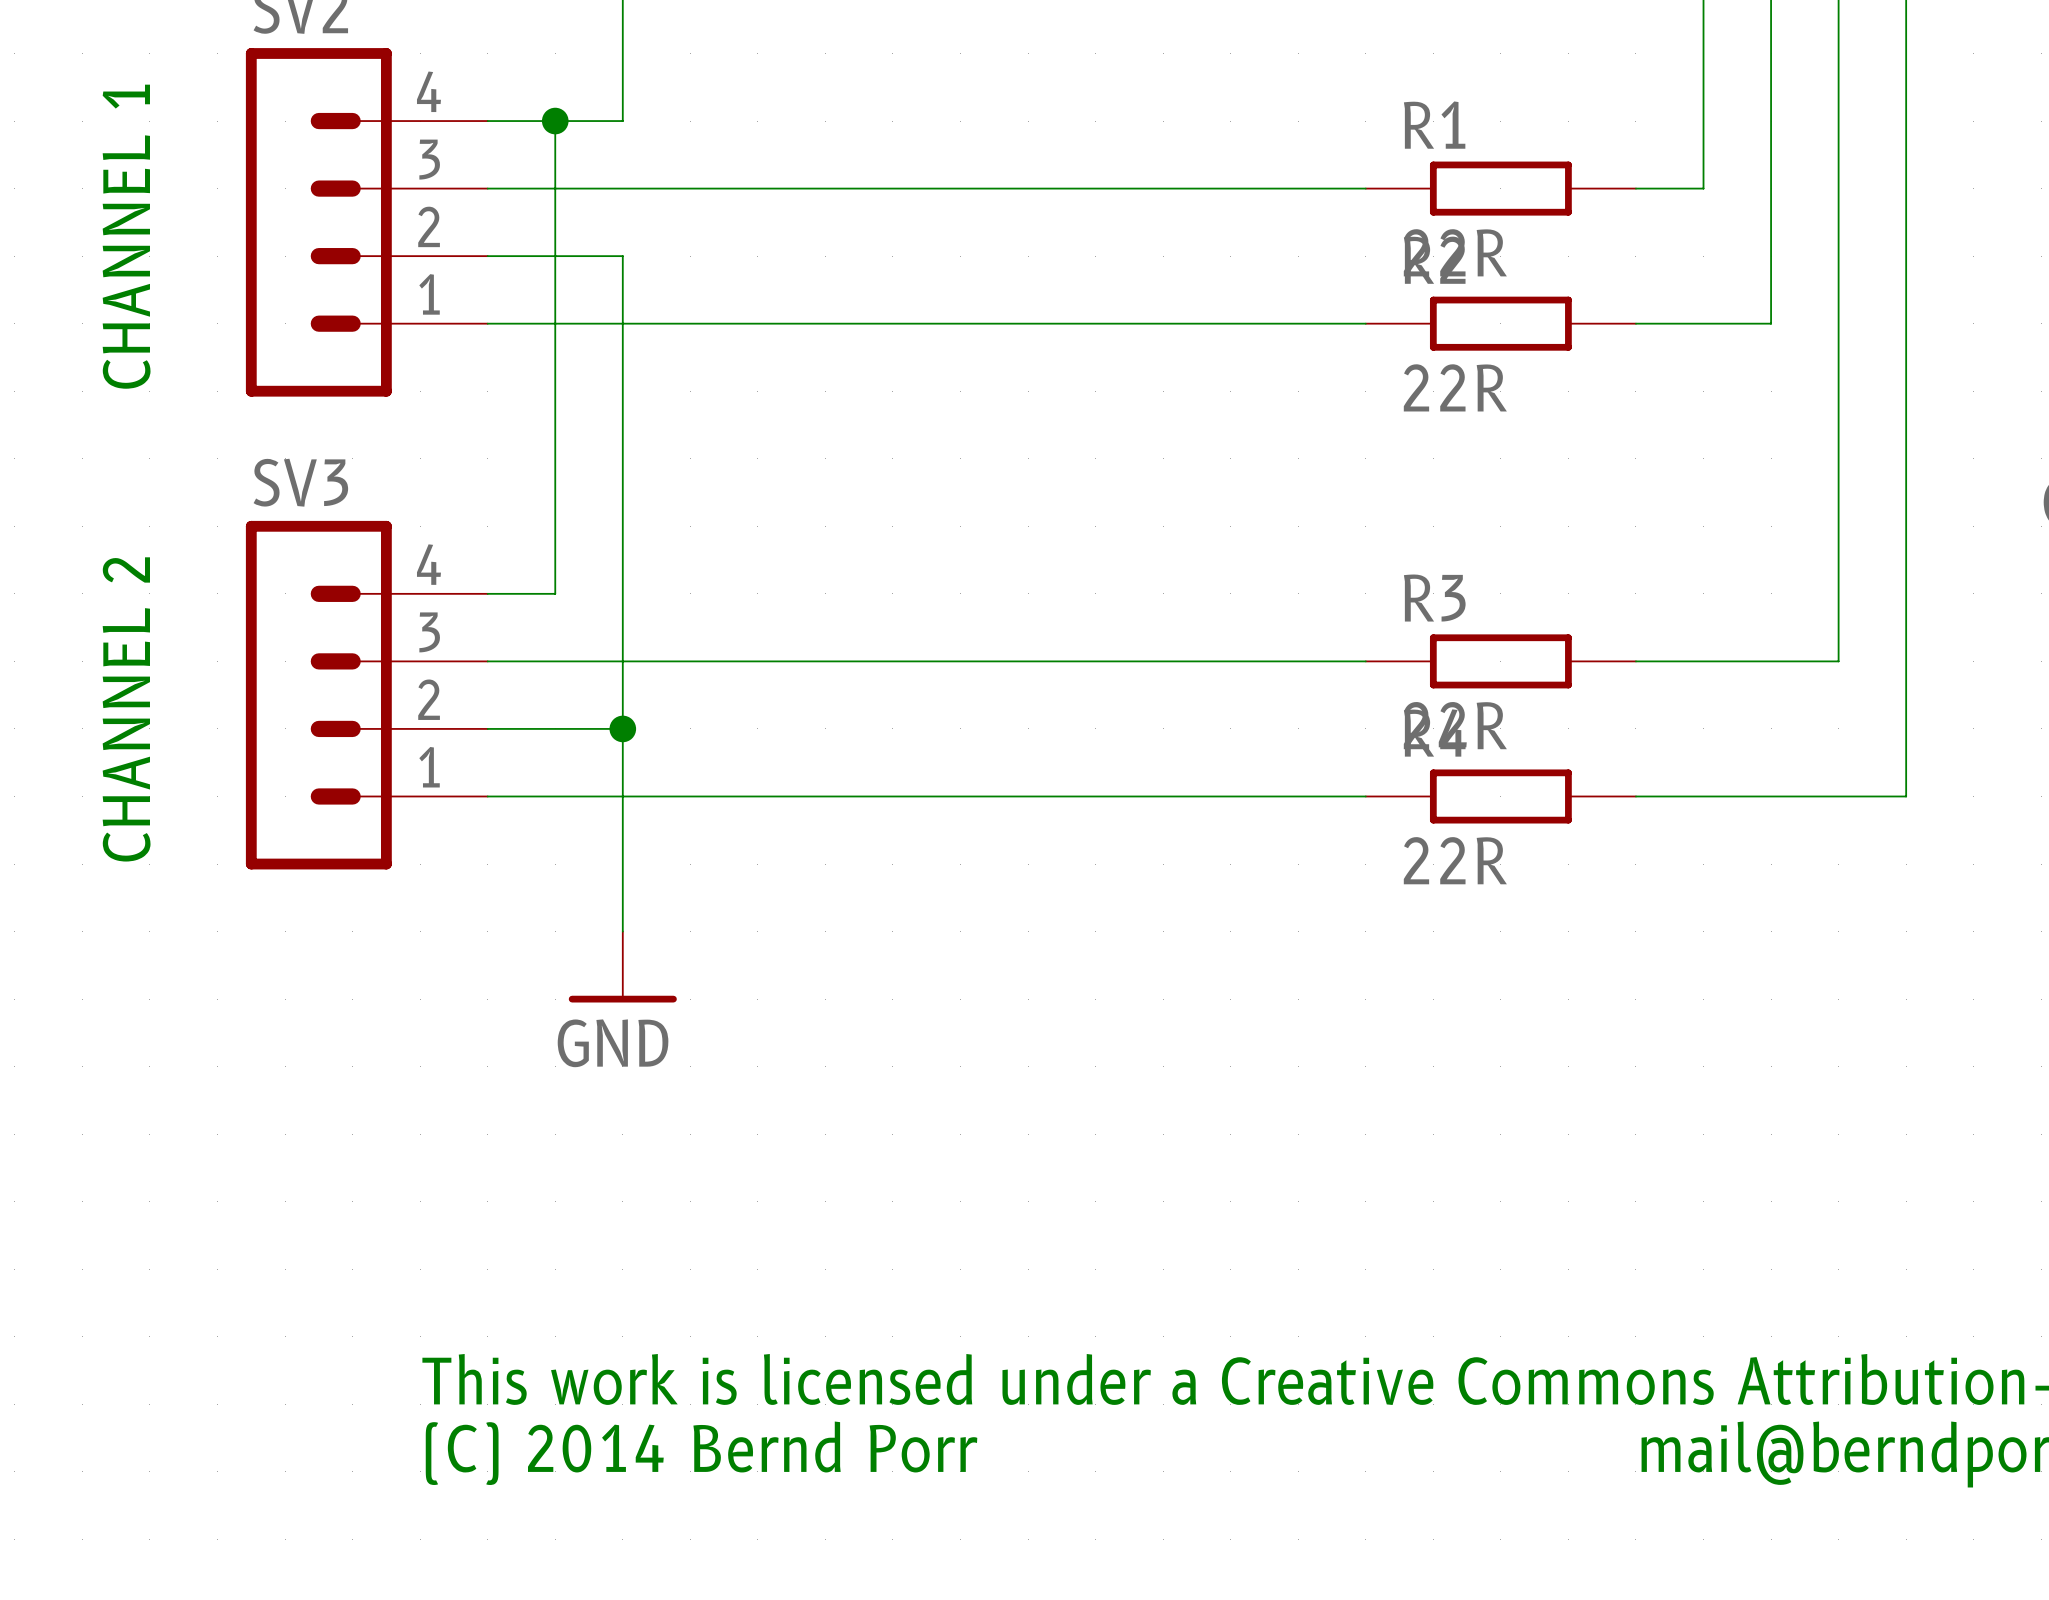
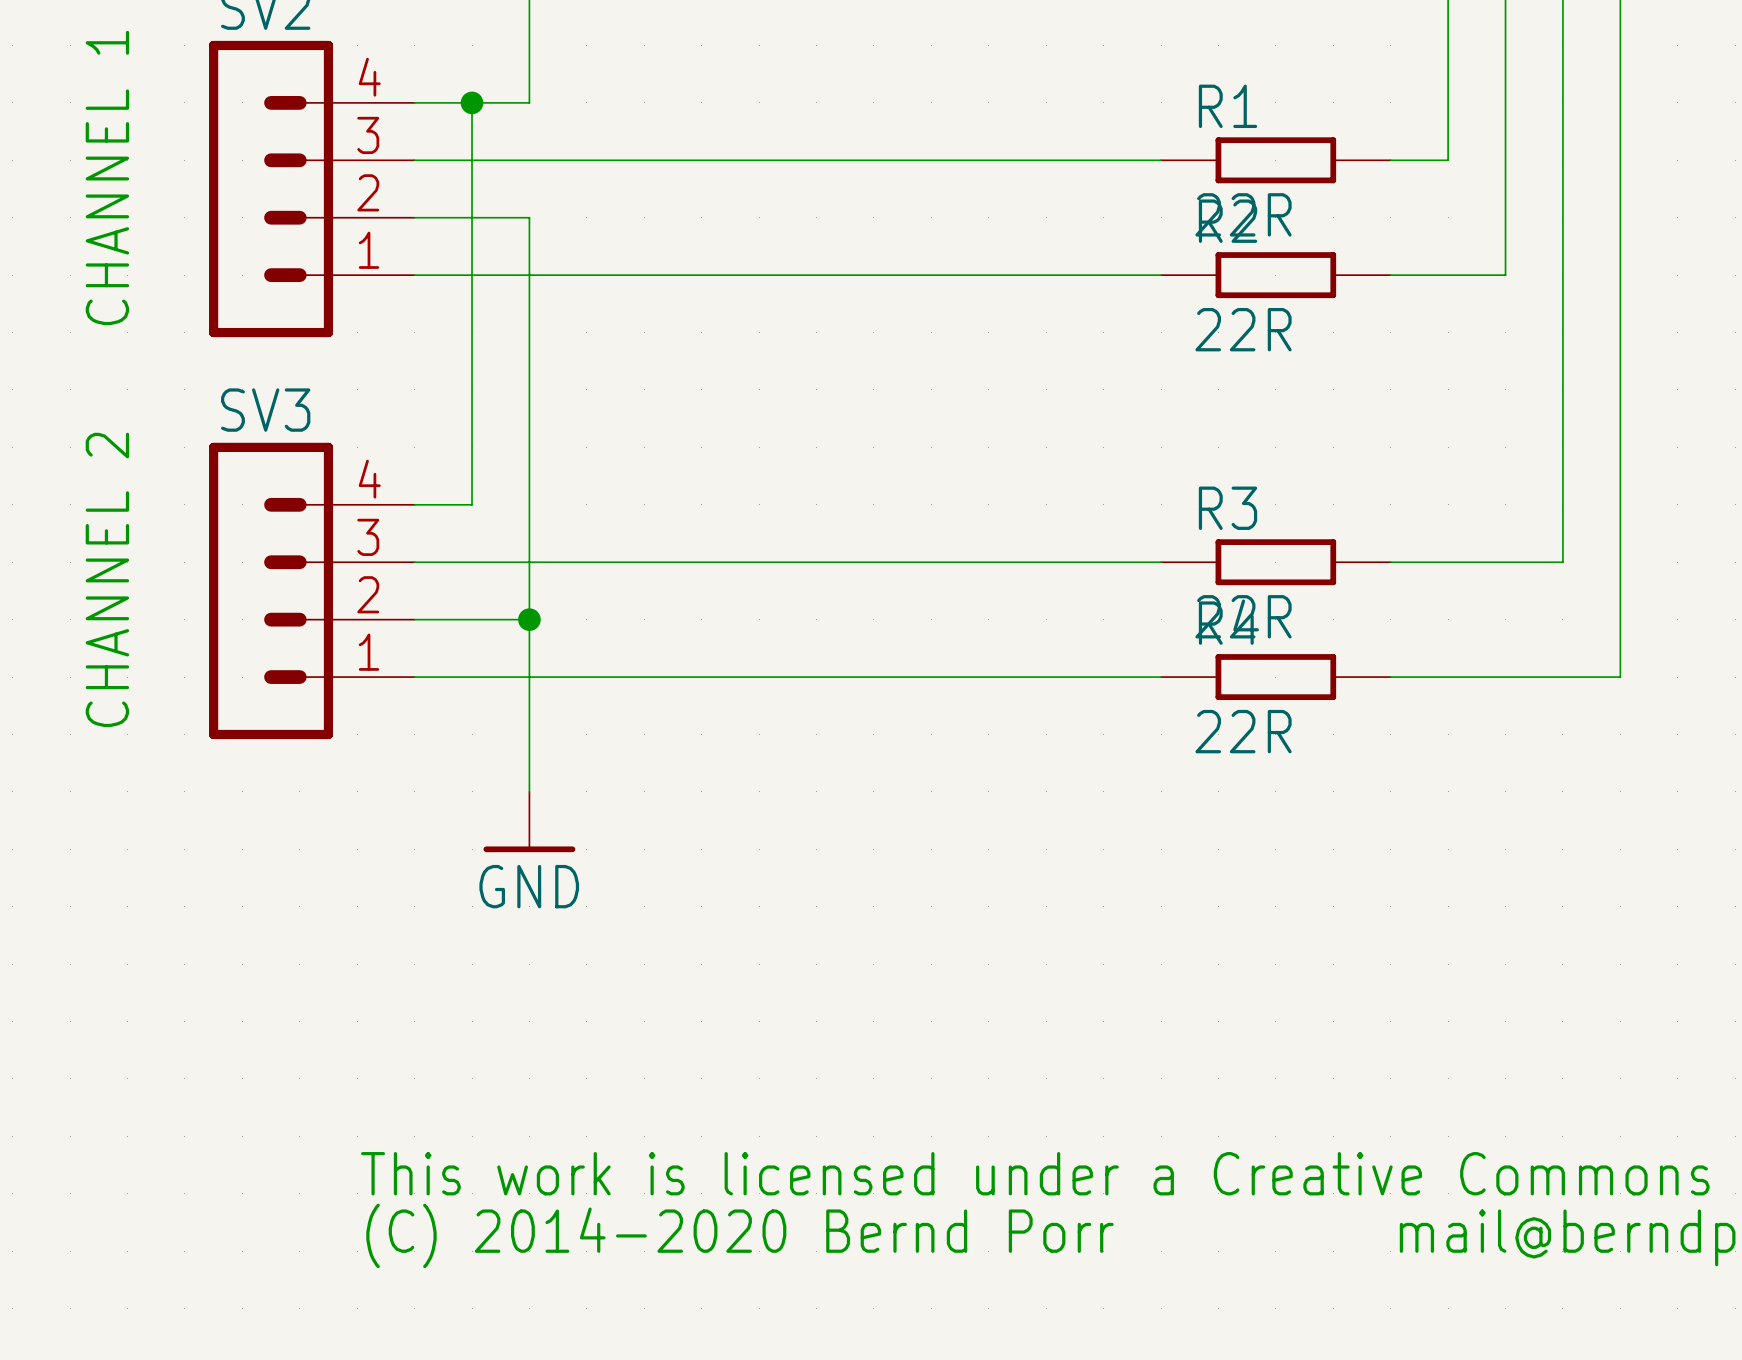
text: (C) 2014 Bernd Porr (701, 1453) -> (C) 2014-2020 Bernd Porr (739, 1235)

